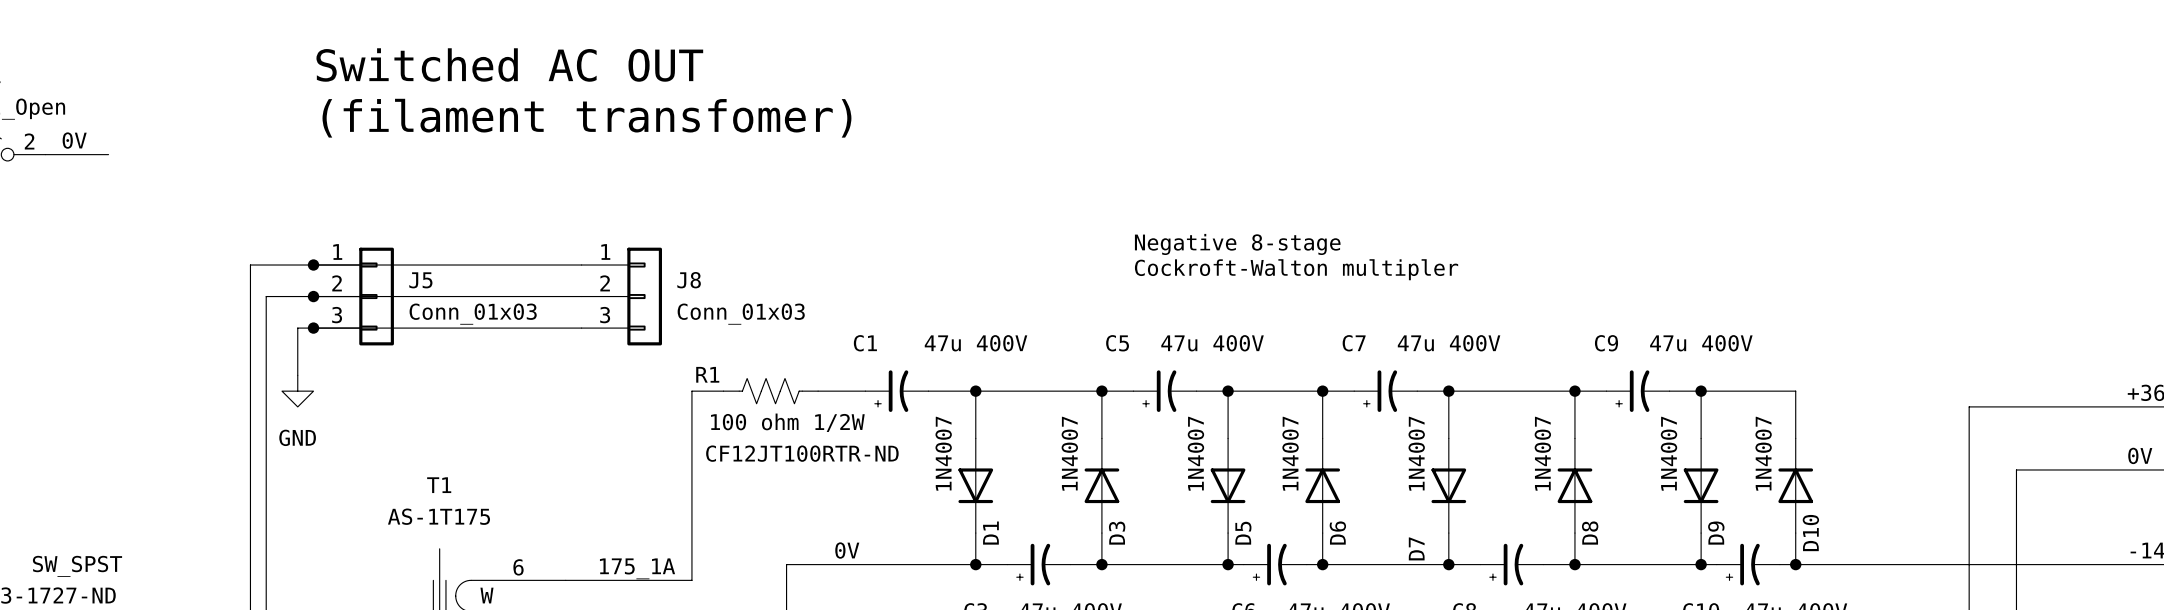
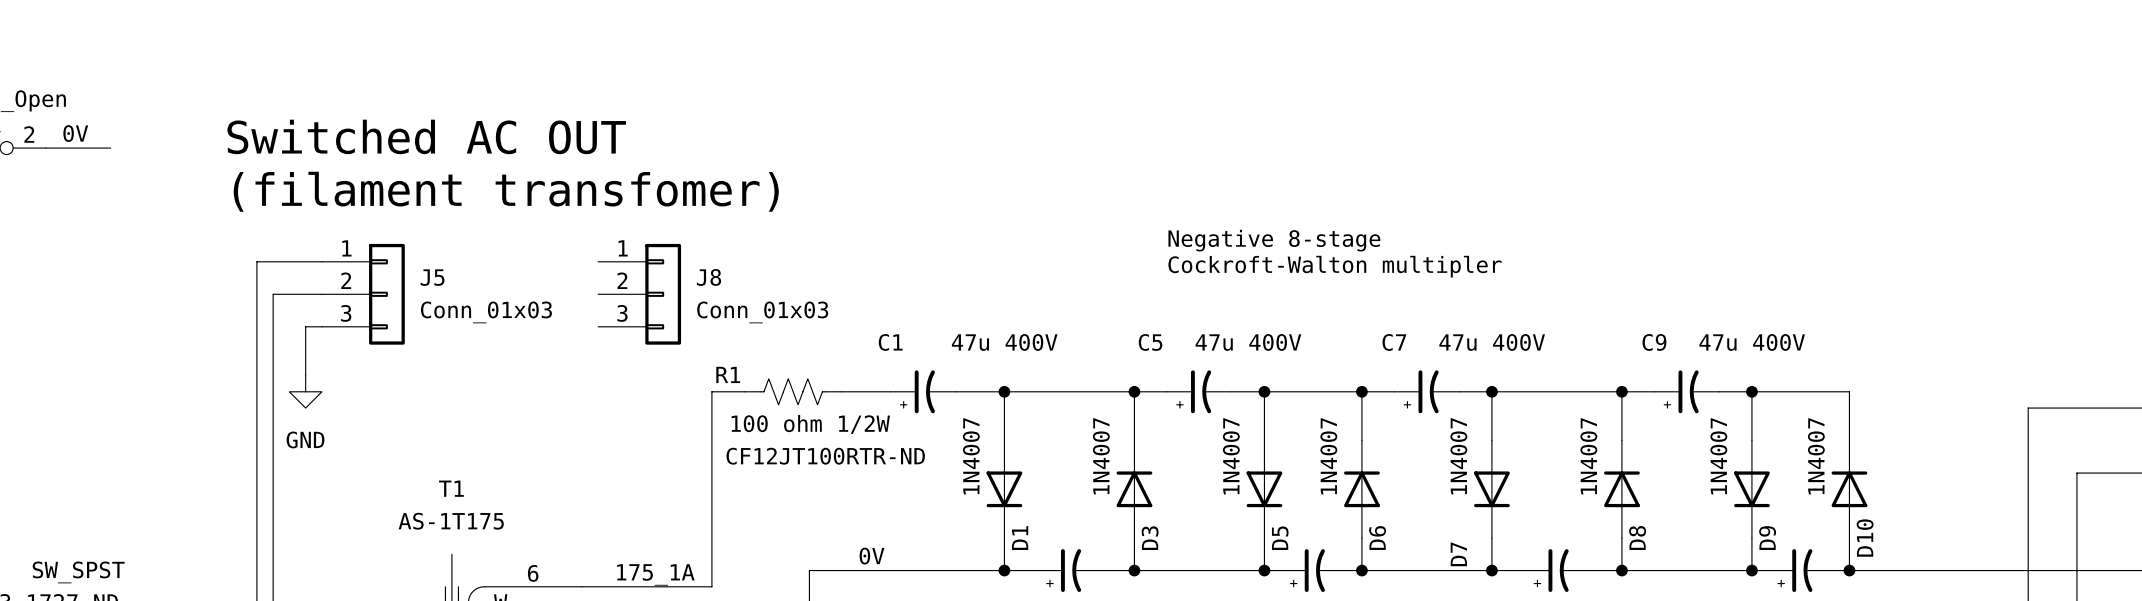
text position: Switched AC OUT (509, 65) -> Switched AC OUT (426, 136)
text position: (filament transfomer) (586, 118) -> (filament transfomer) (506, 191)
wire: (313, 265) (581, 265) -> none
junction: (313, 265) -> none
wire: (313, 296) (581, 296) -> none
junction: (313, 296) -> none
wire: (313, 328) (581, 328) -> none
junction: (313, 328) -> none

